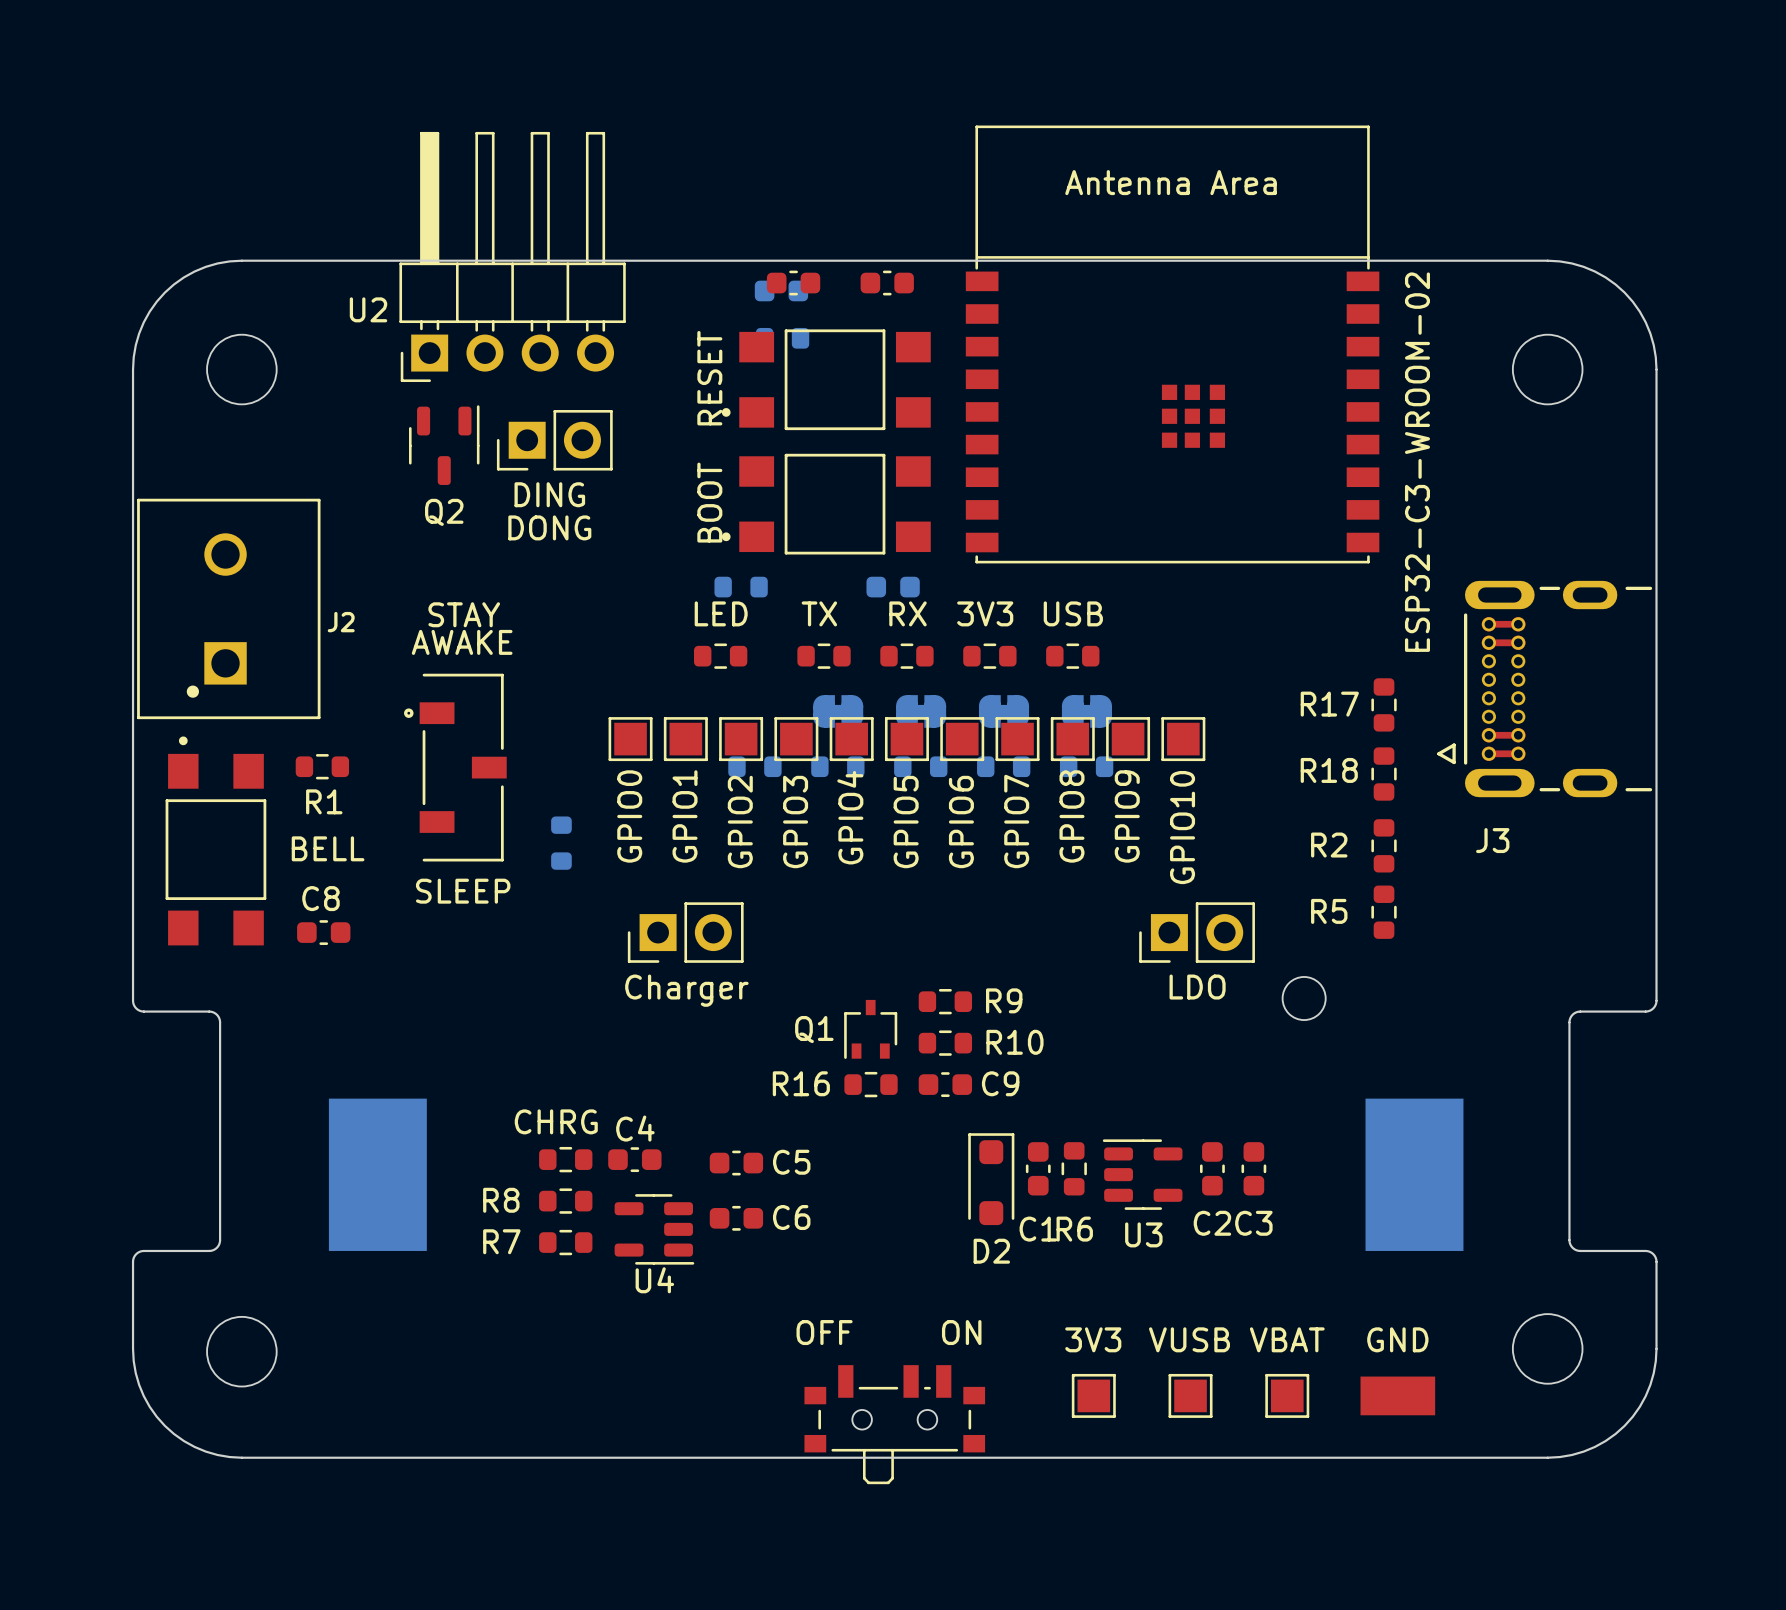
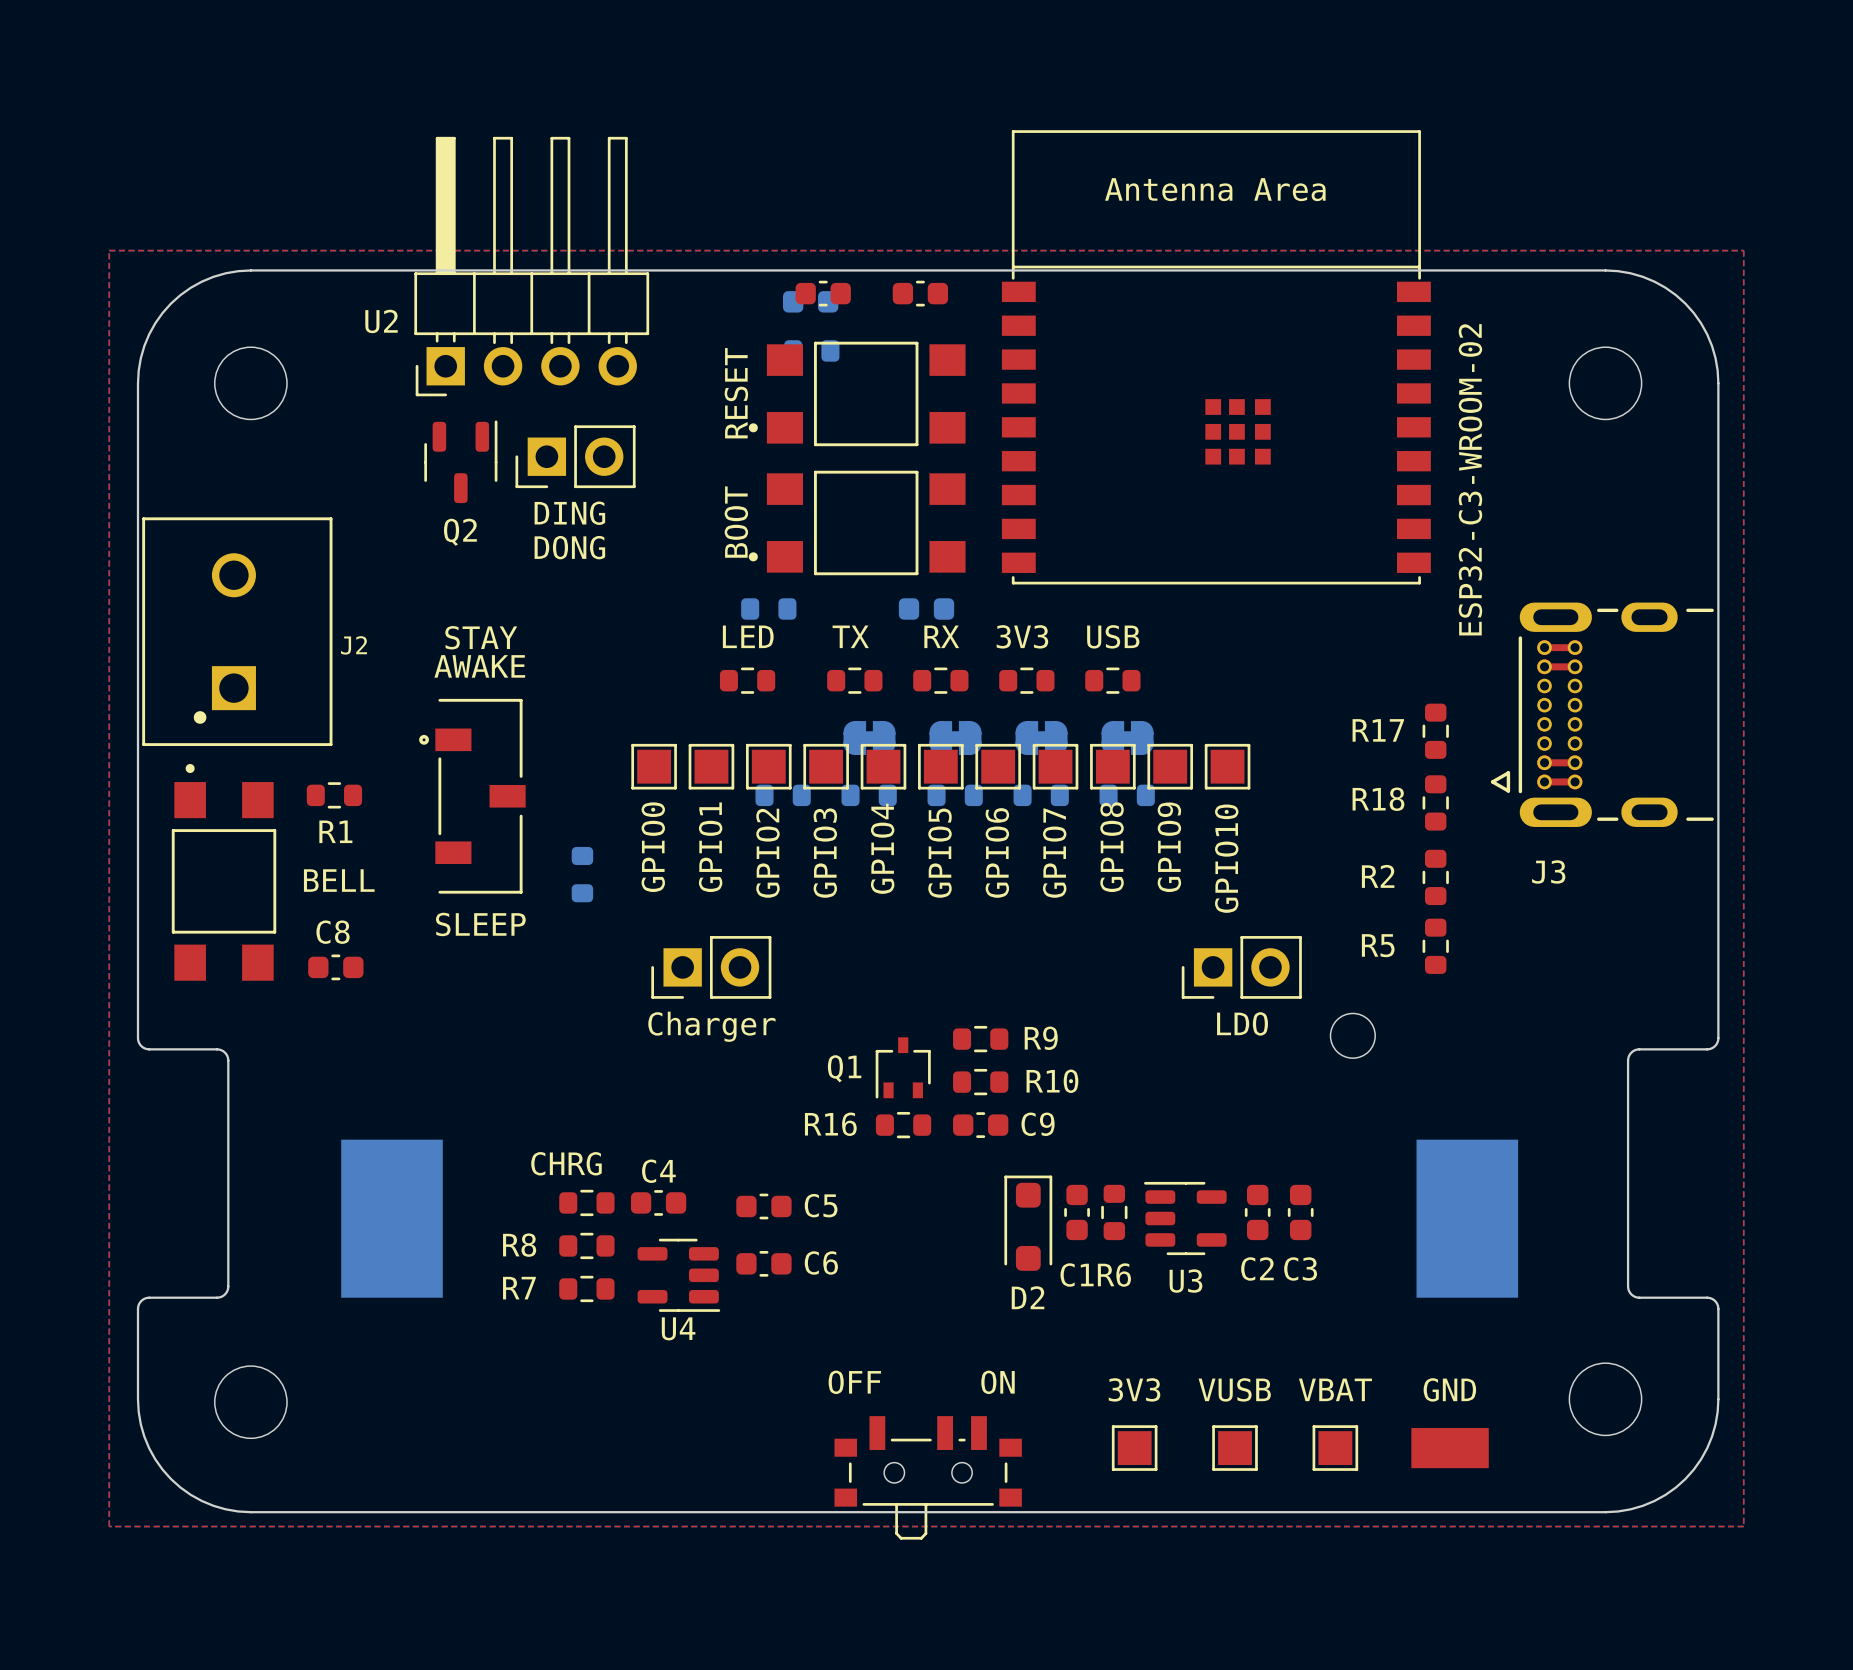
top zone outline: none -> (109, 250) (1743, 250) (1743, 1526) (109, 1526) (109, 250)

